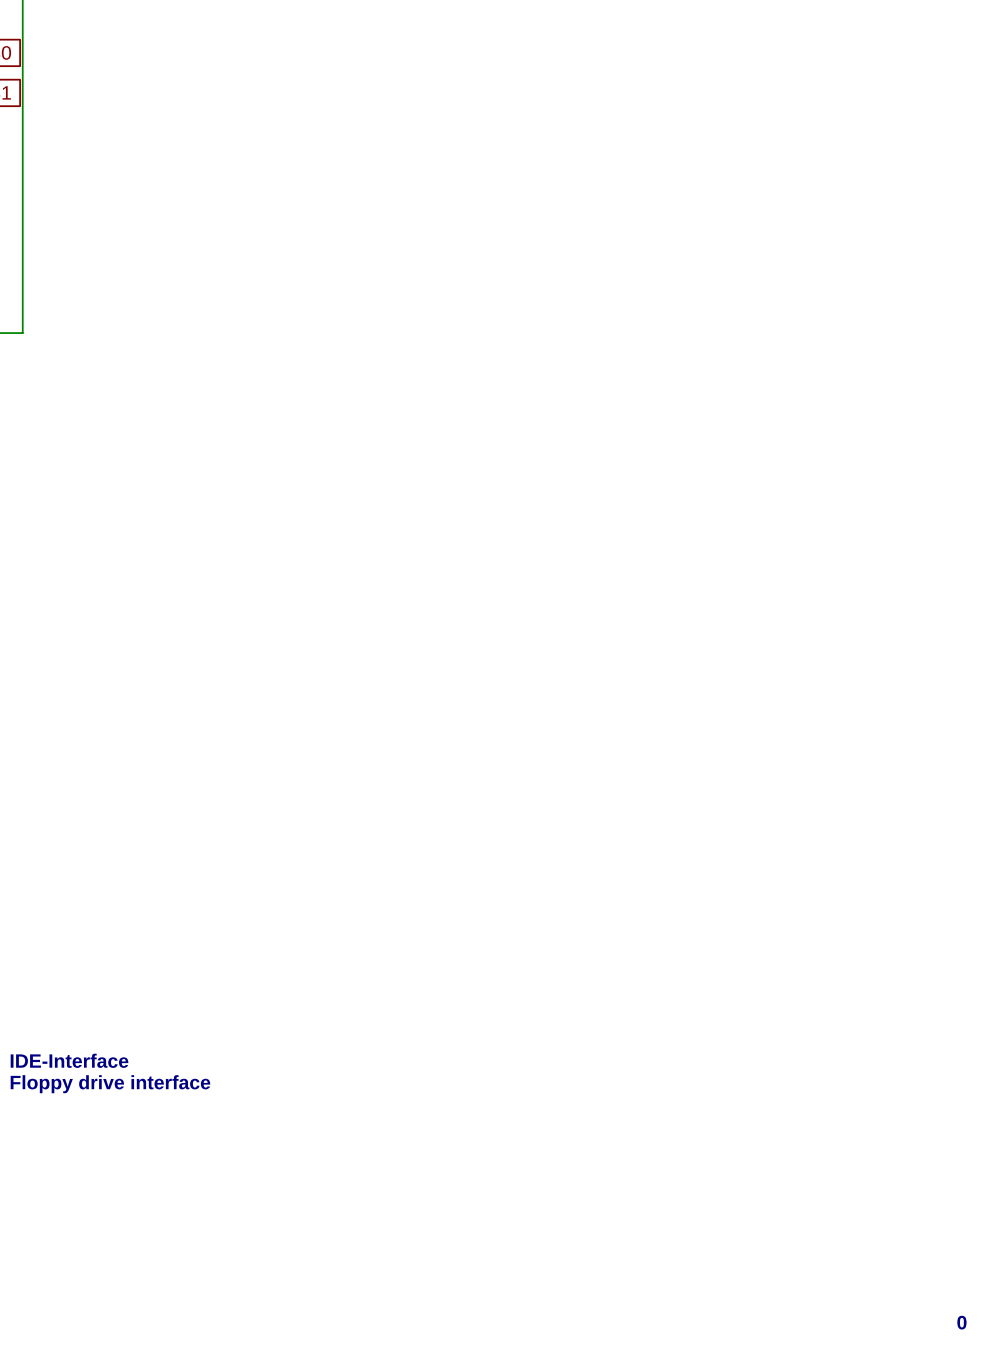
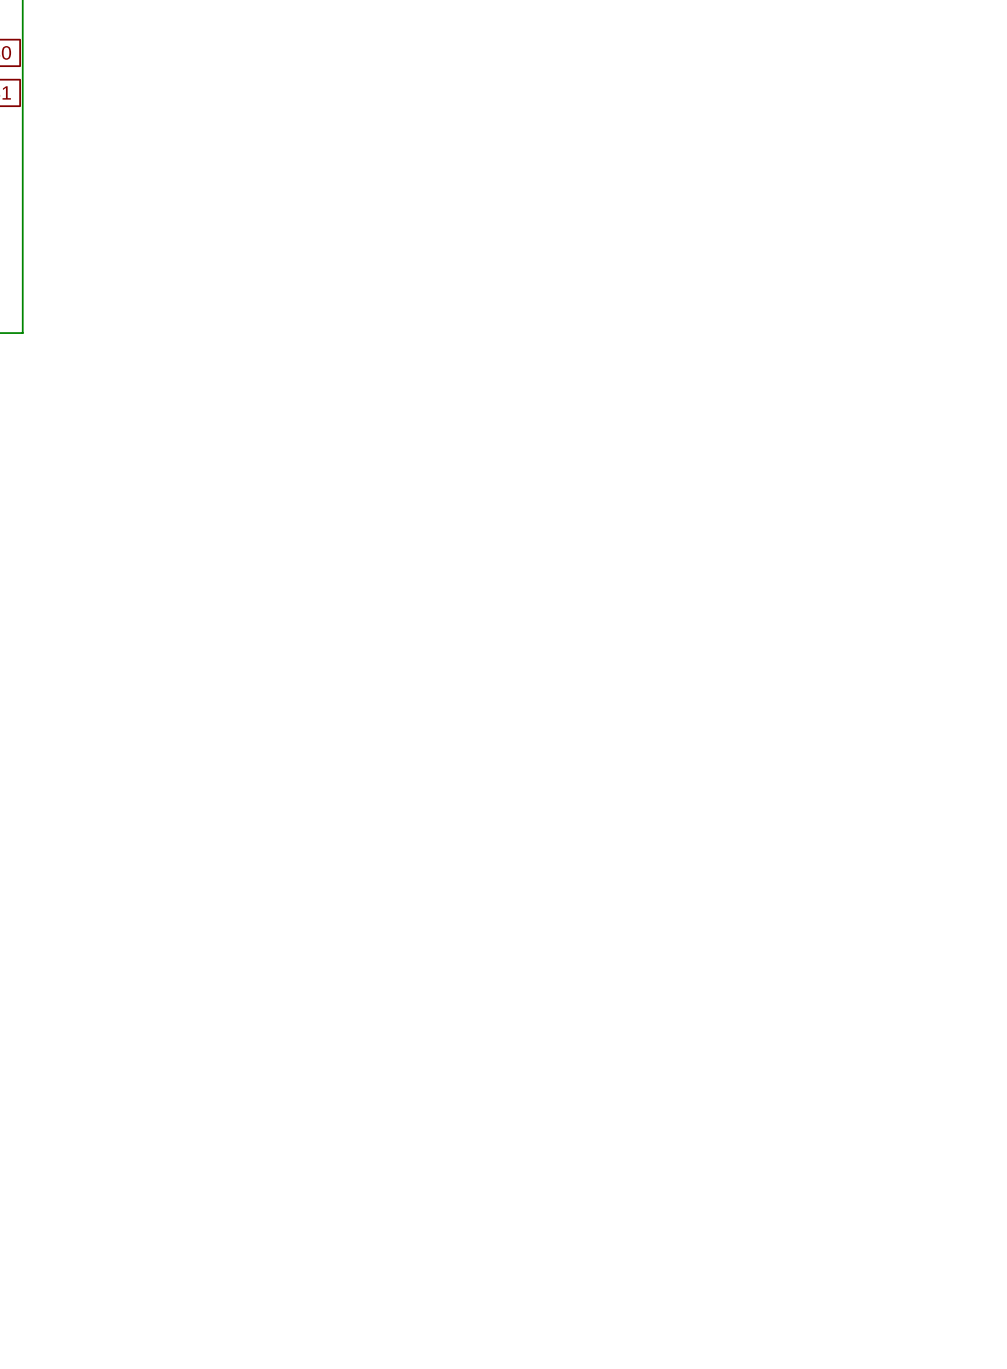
text: IDE-Interface (69, 1060) -> none
text: Floppy drive interface (110, 1084) -> none
text: 0 (961, 1322) -> none

